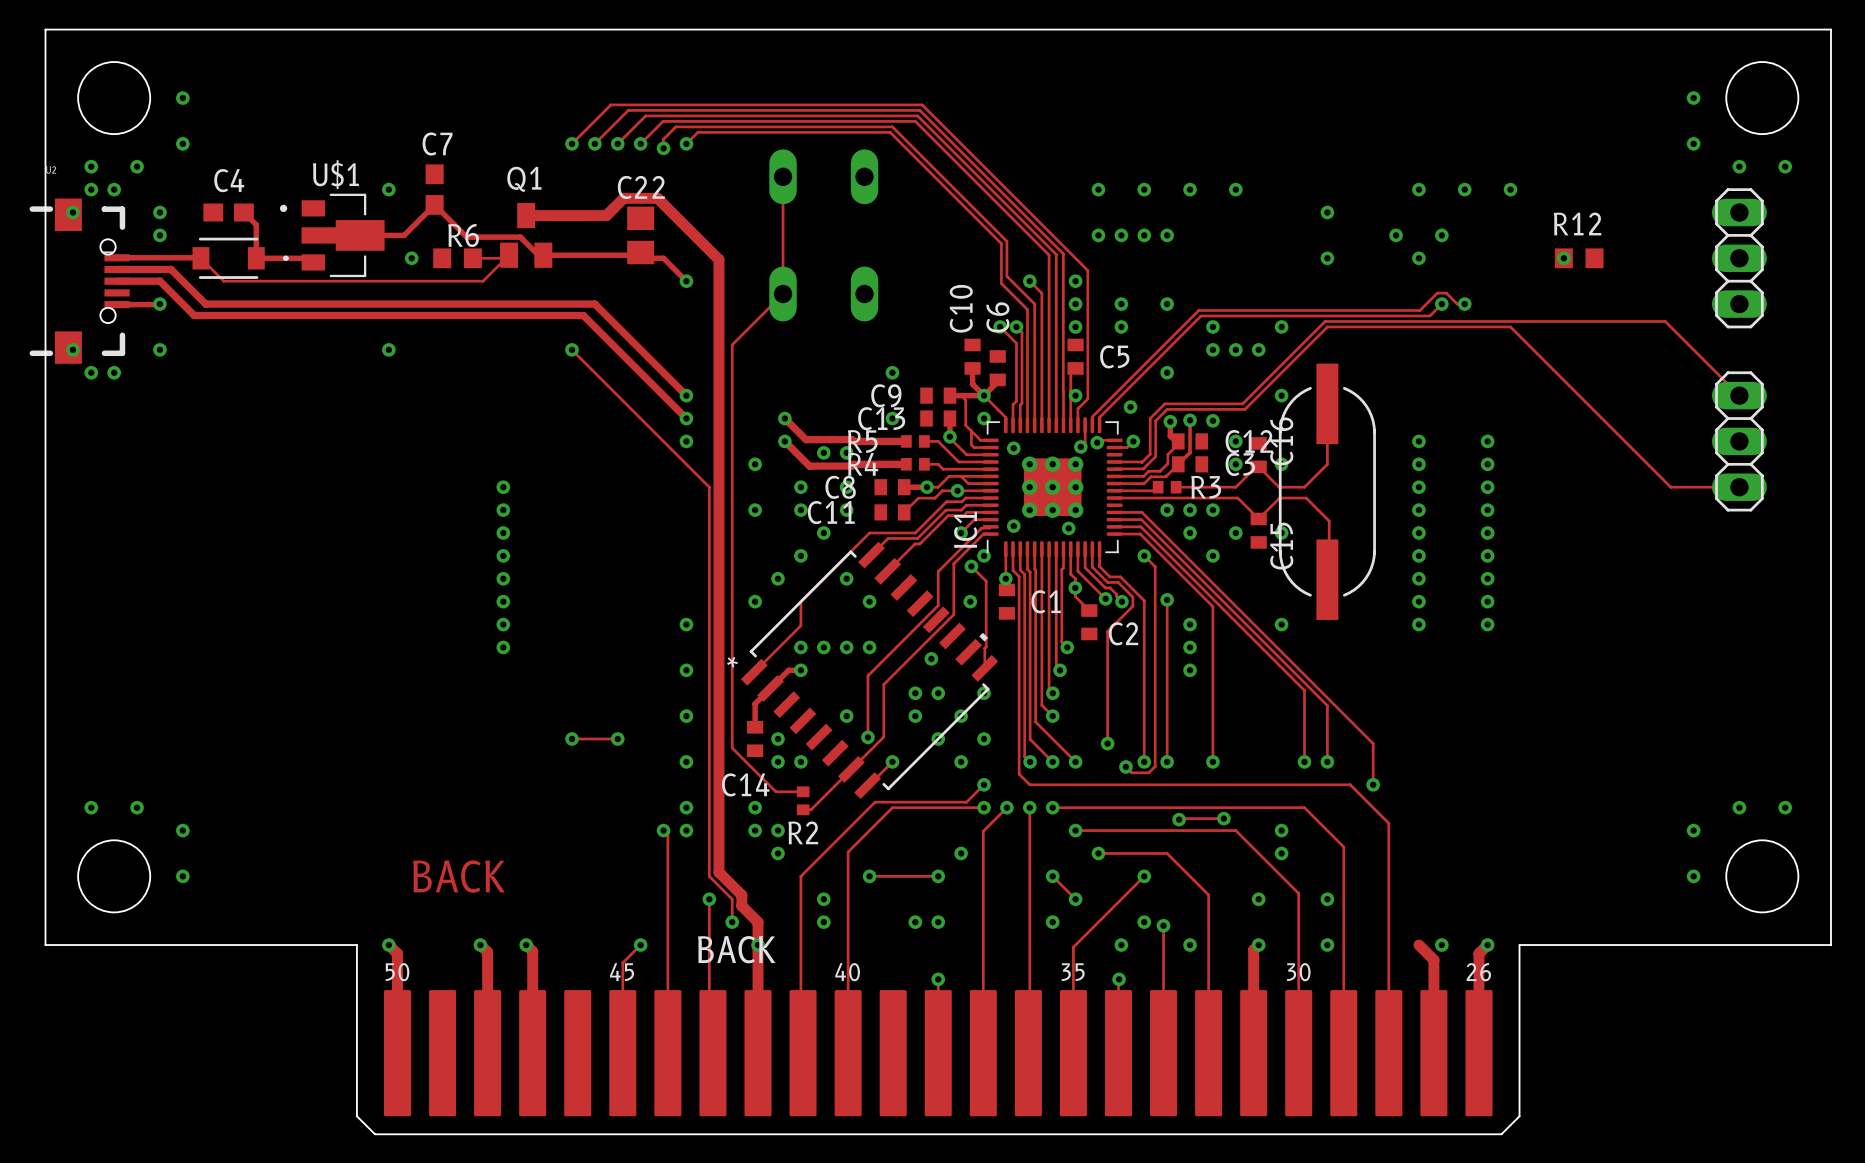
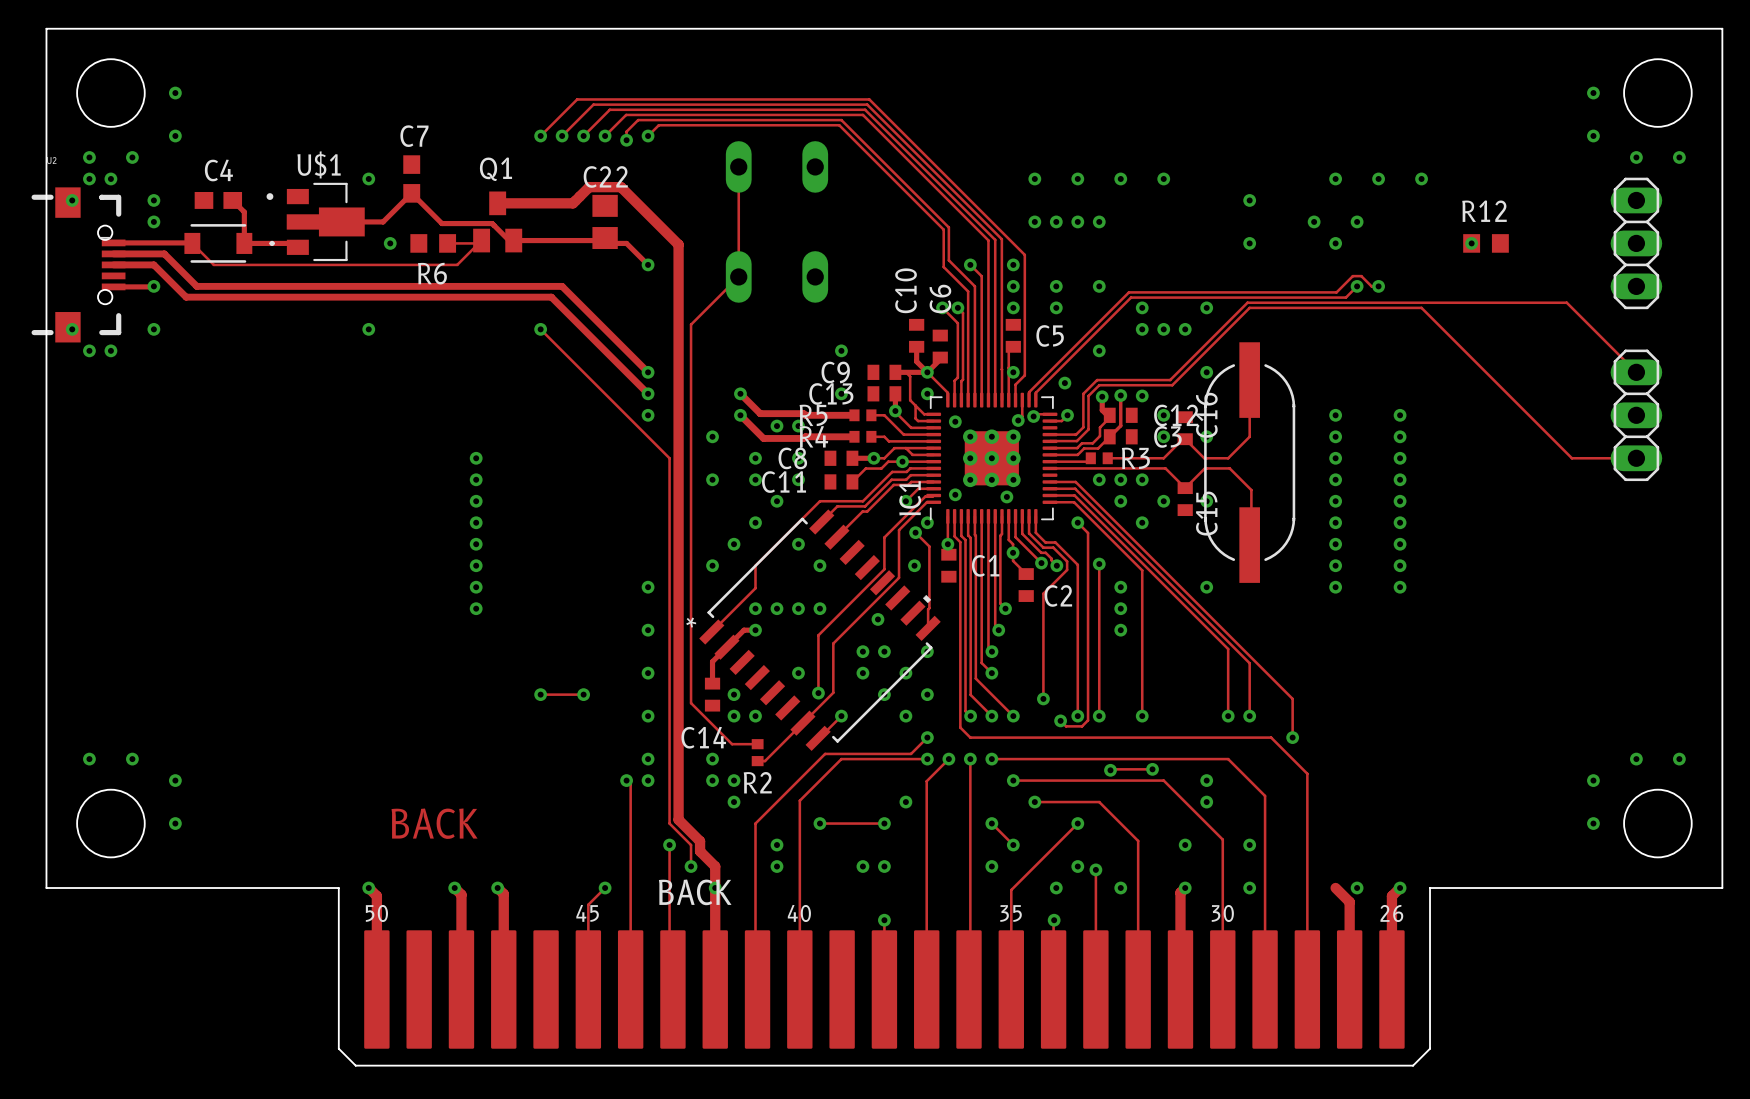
R6 name position: R6 (463, 235) -> R6 (432, 273)

